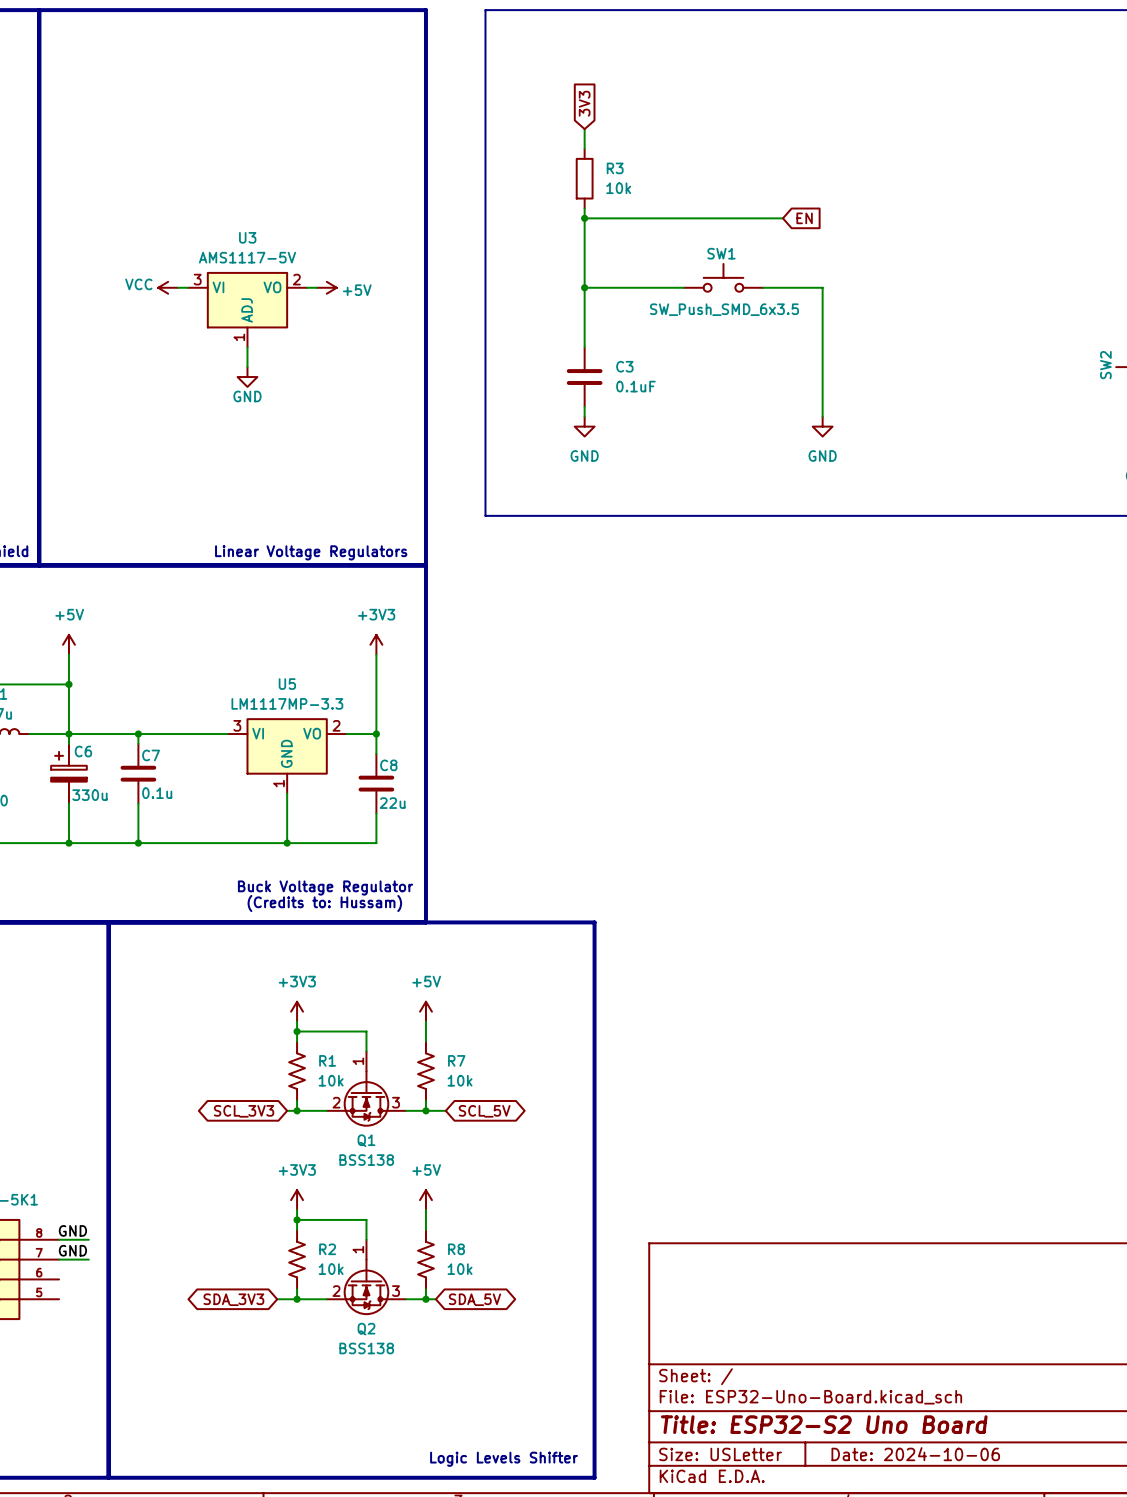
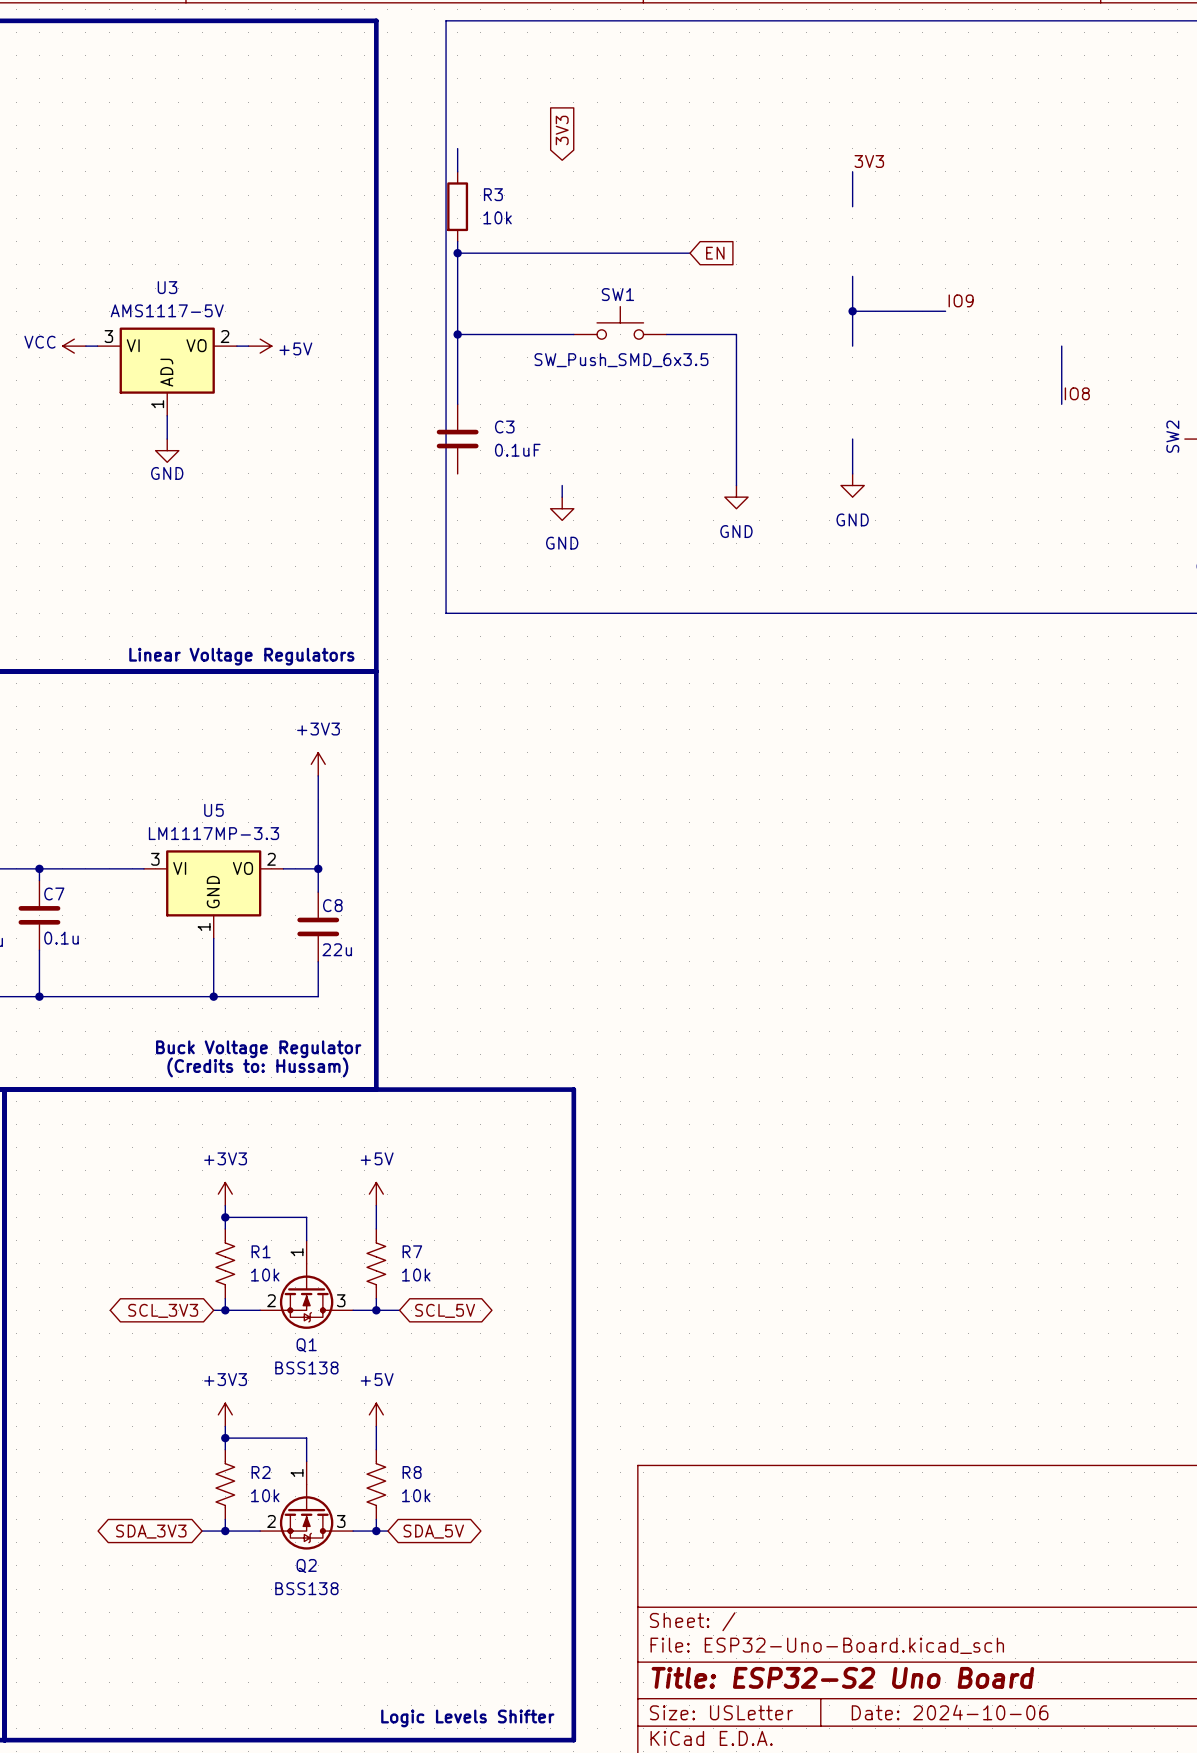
wire: (584, 129) (584, 148) -> (457, 148) (457, 171)
label: none -> 3V3 (869, 161)
wire: none -> (852, 171) (852, 206)
R3 position: (584, 178) -> (457, 206)
junction: none -> (457, 253)
wire: (584, 208) (584, 347) -> (457, 241) (457, 404)
wire: (584, 218) (782, 218) -> (457, 253) (689, 253)
junction: (584, 218) -> none
global label position: EN (804, 218) -> EN (715, 253)
wire: none -> (852, 276) (852, 346)
label: none -> IO9 (961, 300)
wire: none -> (852, 311) (945, 311)
junction: none -> (852, 311)
junction: none -> (457, 334)
SW1 position: (723, 277) -> (620, 322)
wire: (584, 287) (683, 287) -> (457, 334) (573, 334)
junction: (584, 287) -> none
wire: (763, 287) (822, 287) (822, 416) -> (666, 334) (736, 334) (736, 485)
wire: none -> (1061, 346) (1061, 404)
label: none -> IO8 (1077, 393)
wire: none -> (852, 439) (852, 473)
C3 position: (584, 377) -> (457, 439)
power symbol: none -> GND (736, 497)
power symbol position: GND (822, 426) -> GND (852, 485)

